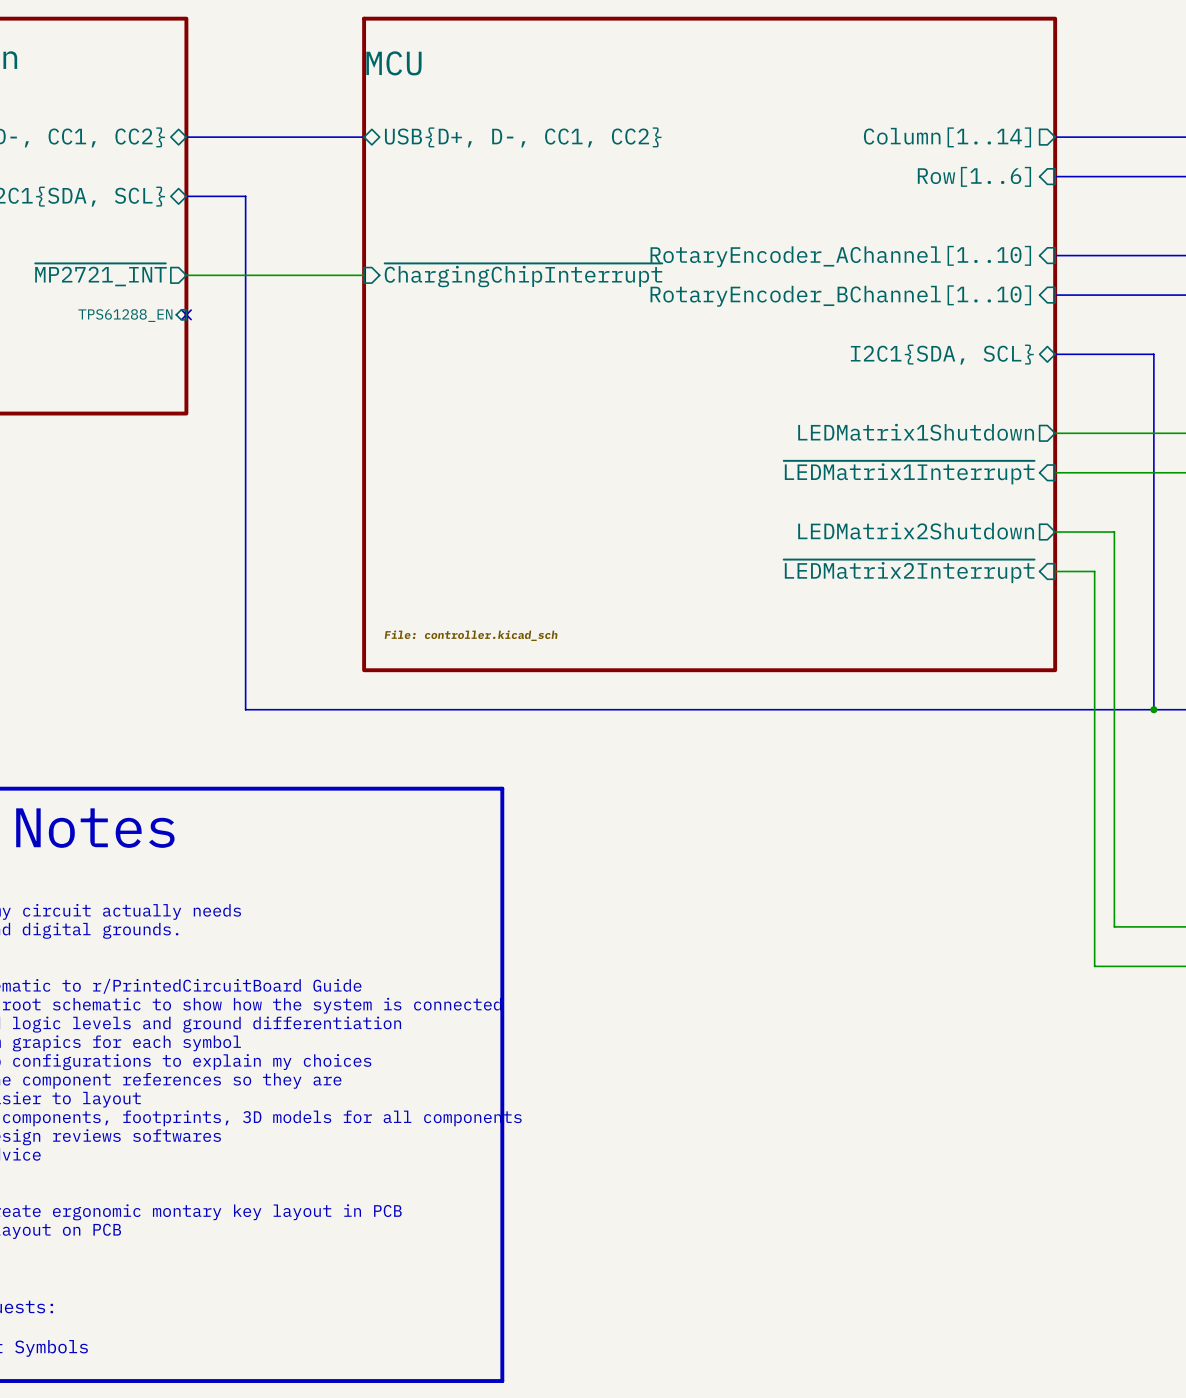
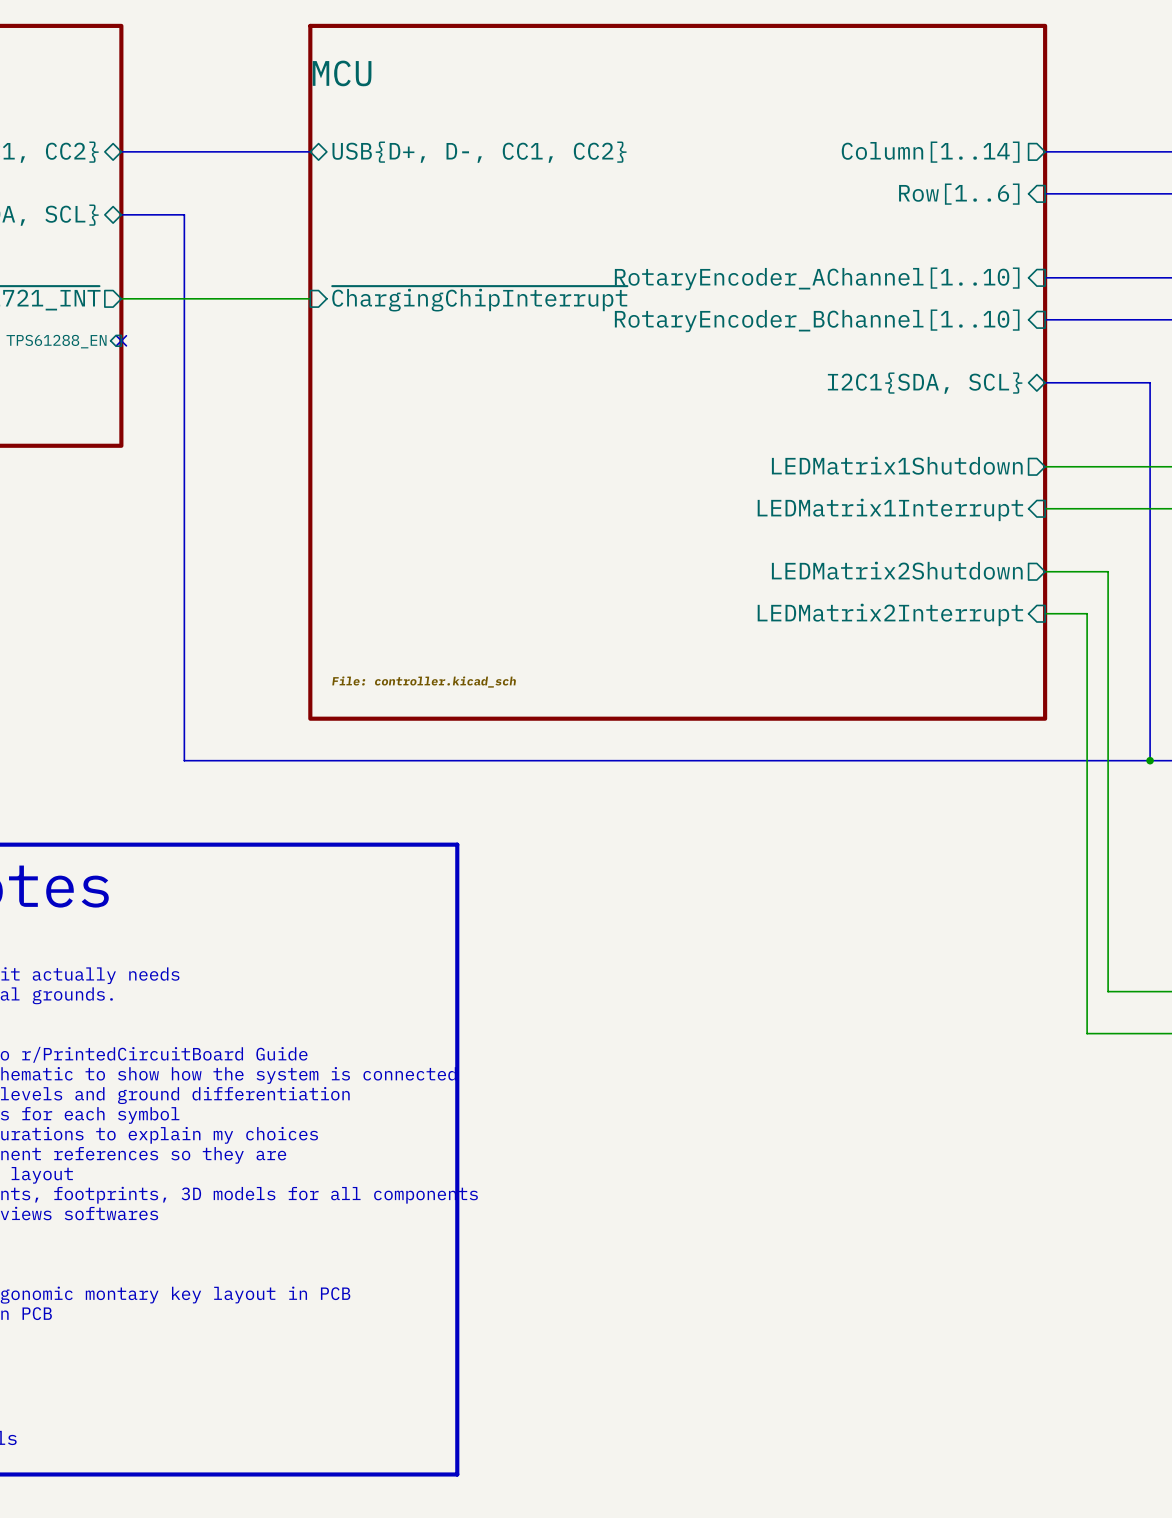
sheet pin: ~{LEDMatrix1Interrupt} (909, 472) -> LEDMatrix1Interrupt (890, 509)
sheet pin: ~{LEDMatrix2Interrupt} (909, 571) -> LEDMatrix2Interrupt (890, 614)

